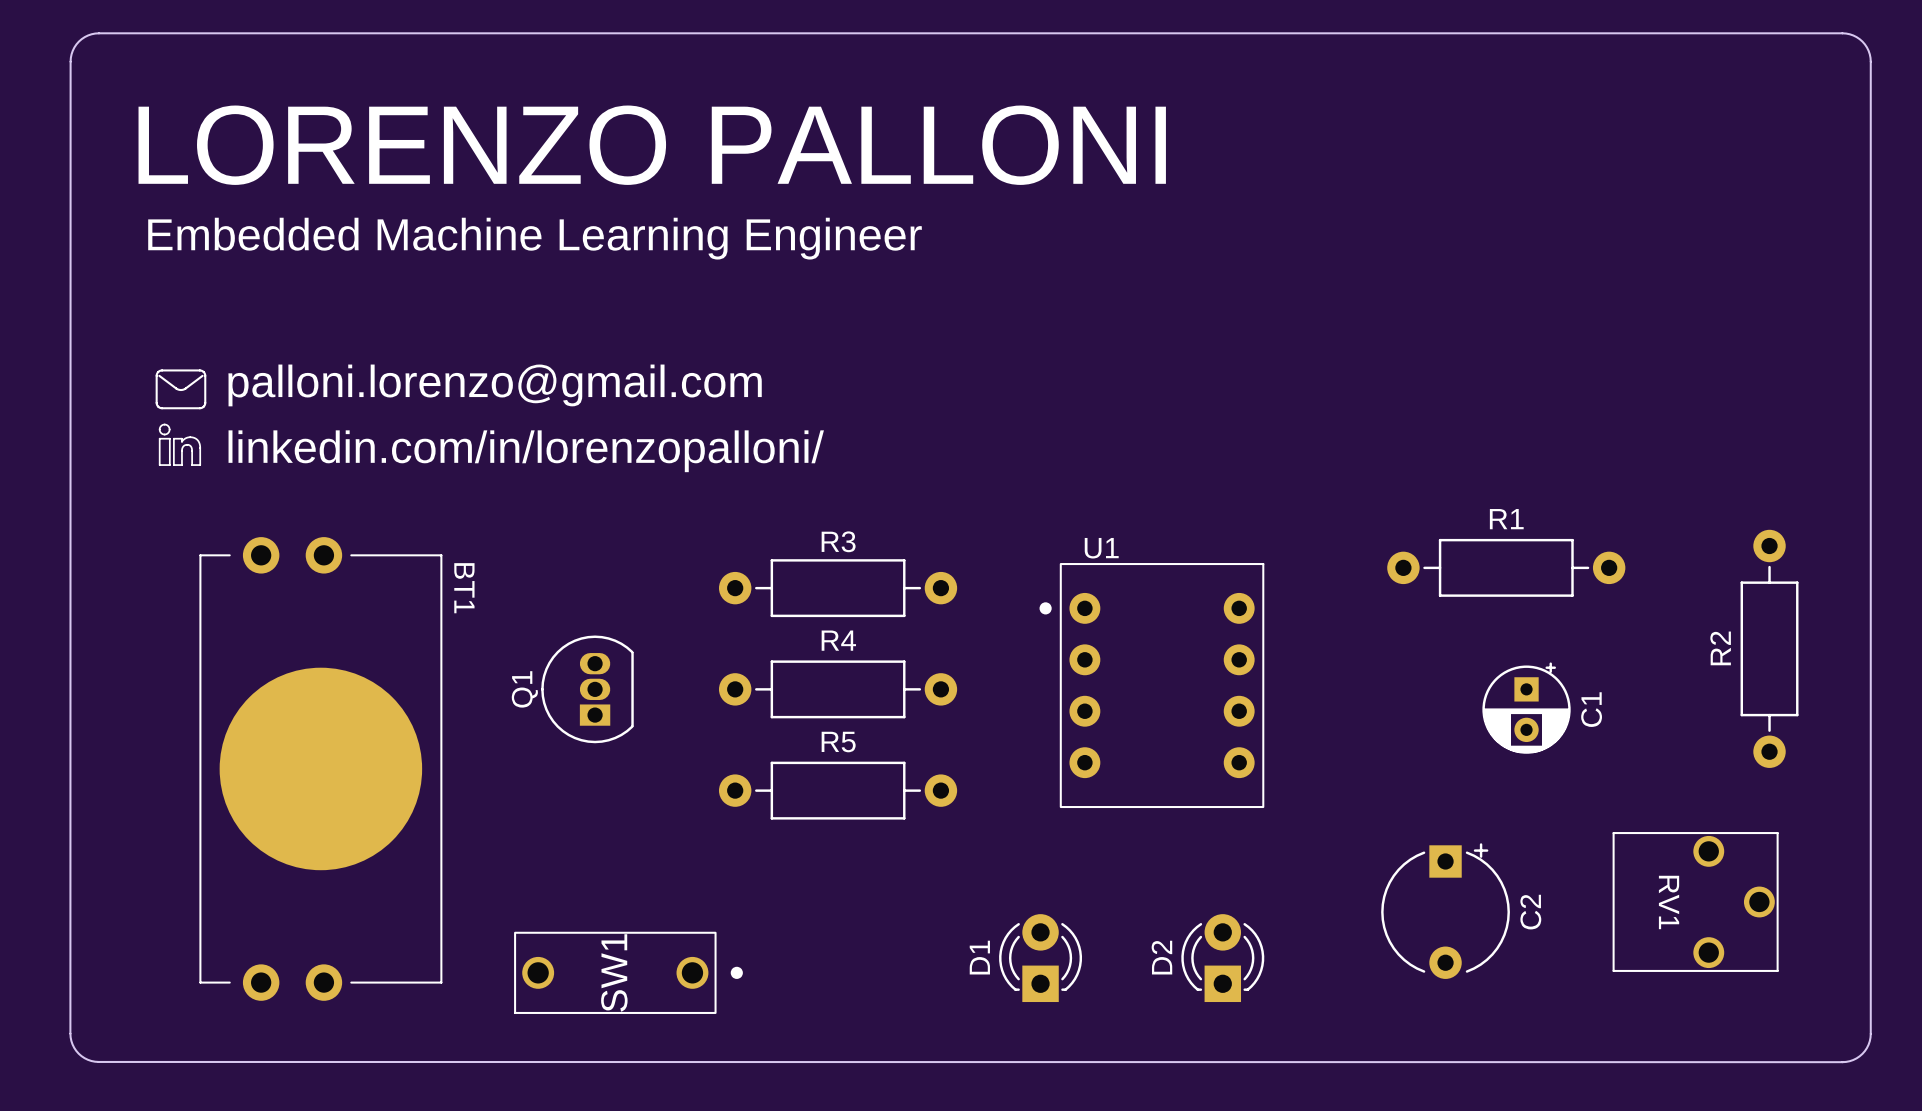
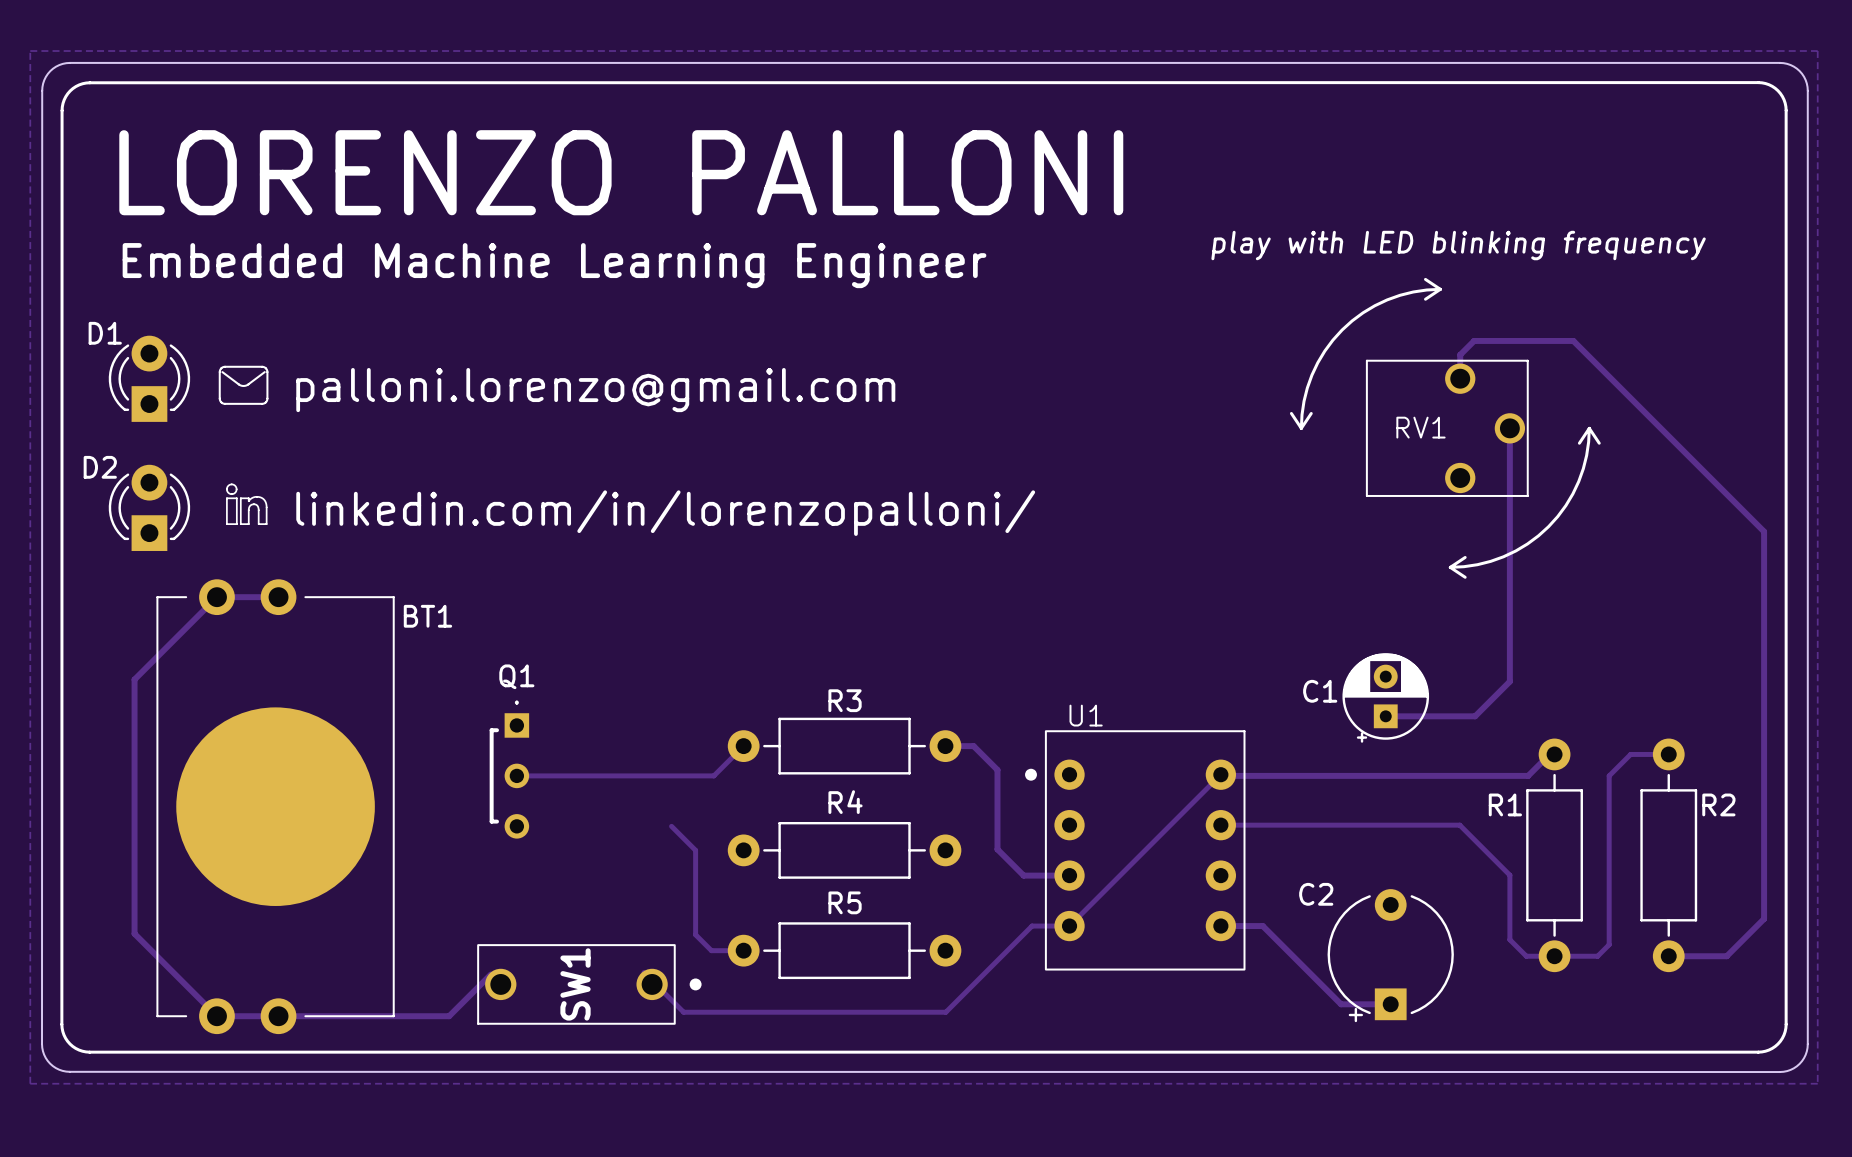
zone outline: none -> (30, 51) (1817, 51) (1817, 1083) (30, 1083) (30, 51)
line: none -> (1758, 82) (89, 82) (75, 86) (65, 96) (62, 110) (61, 1024) (65, 1038) (75, 1048) (89, 1052) (1758, 1052) (1772, 1048) (1782, 1038) (1786, 1024) (1786, 110) (1784, 99) (1777, 90) (1768, 84) (1758, 82)
text: none -> play with LED blinking frequency (1458, 245)
line: none -> (1425, 279) (1440, 289)
line: none -> (1440, 289) (1425, 299)
line: none -> (1440, 289) (1413, 292) (1387, 299) (1363, 312) (1342, 330) (1324, 351) (1311, 375) (1304, 401) (1301, 428)
track: none -> (1460, 378) (1460, 354) (1474, 340) (1573, 340) (1764, 531) (1764, 918) (1726, 956) (1673, 956)
line: (162, 370) (203, 371) (205, 375) (204, 406) (199, 408) (158, 407) (156, 403) (156, 375) (162, 370) -> (225, 366) (265, 367) (267, 372) (266, 401) (262, 403) (221, 402) (219, 398) (219, 371) (225, 366)
line: (159, 375) (180, 390) (202, 375) -> (222, 372) (243, 385) (264, 372)
text position: palloni.lorenzo@gmail.com (495, 385) -> palloni.lorenzo@gmail.com (595, 390)
line: none -> (1291, 413) (1301, 428)
line: none -> (1311, 413) (1301, 428)
track: none -> (1509, 428) (1509, 681) (1475, 716) (1385, 716)
line: none -> (1589, 428) (1599, 443)
line: none -> (1589, 428) (1579, 443)
line: none -> (1589, 428) (1586, 455) (1578, 481) (1565, 505) (1548, 526) (1527, 543) (1503, 556) (1477, 564) (1450, 567)
line: (164, 424) (169, 429) (164, 434) (159, 429) (164, 424) -> (231, 484) (236, 489) (231, 494) (226, 489) (231, 484)
line: (190, 437) (181, 441) (181, 438) (173, 438) (173, 465) (181, 465) (182, 448) (187, 444) (191, 448) (192, 465) (200, 465) (199, 443) (195, 438) (190, 437) -> (256, 496) (248, 501) (248, 498) (240, 498) (240, 524) (248, 524) (248, 508) (253, 504) (258, 507) (258, 524) (266, 524) (265, 502) (262, 498) (256, 496)
line: (159, 438) (159, 465) (169, 465) (169, 438) (159, 438) -> (226, 498) (226, 524) (236, 524) (236, 498) (226, 498)
text position: linkedin.com/in/lorenzopalloni/ (526, 451) -> linkedin.com/in/lorenzopalloni/ (665, 513)
R1 name position: R1 (1506, 519) -> R1 (1505, 804)
line: none -> (1465, 557) (1450, 567)
line: none -> (1450, 567) (1465, 577)
R1 rotation: 0° (1506, 567) -> 90° clockwise (1554, 855)
R1 position: (1506, 567) -> (1554, 855)
track: none -> (278, 597) (216, 597) (134, 679) (134, 933) (216, 1016) (449, 1016) (490, 974)
BT1 name rotation: 0° (464, 588) -> 90° counterclockwise (427, 616)
R3 position: (838, 588) -> (844, 746)
Q1 footprint: [541, 635, 634, 744] -> [489, 700, 530, 839]
R2 name rotation: 0° (1720, 648) -> 90° clockwise (1718, 804)
R2 name position: R2 (1720, 648) -> R2 (1718, 804)
R2 position: (1769, 648) -> (1668, 855)
U1 position: (1151, 685) -> (1135, 850)
Q1 name position: Q1 (524, 689) -> Q1 (516, 676)
R4 position: (838, 689) -> (844, 850)
C1 rotation: 0° (1526, 708) -> 180° (1385, 697)
C1 position: (1526, 708) -> (1385, 697)
track: none -> (743, 746) (713, 775) (516, 775) (516, 770)
track: none -> (945, 746) (973, 746) (997, 769) (997, 849) (1023, 875) (1069, 875) (1063, 875)
track: none -> (1549, 754) (1528, 775) (1220, 774)
track: none -> (1668, 754) (1630, 754) (1609, 775) (1609, 944) (1597, 956) (1526, 956) (1509, 939) (1509, 875) (1459, 825) (1220, 825) (1220, 820) (1223, 817)
track: none -> (1220, 774) (1069, 926) (1032, 926) (945, 1012) (683, 1012) (643, 972)
BT1 position: (320, 768) -> (275, 806)
R5 position: (838, 790) -> (844, 950)
track: none -> (671, 826) (695, 850) (695, 934) (711, 950) (743, 950) (743, 944)
RV1 position: (1695, 901) -> (1447, 428)
RV1 name rotation: 0° (1669, 902) -> 90° counterclockwise (1420, 427)
C2 rotation: 0° (1445, 911) -> 180° (1390, 955)
C2 name position: C2 (1530, 912) -> C2 (1316, 894)
track: none -> (1220, 926) (1262, 926) (1341, 1004) (1380, 1004)
D1 name rotation: 0° (979, 957) -> 90° clockwise (105, 333)
D2 name rotation: 0° (1161, 957) -> 90° clockwise (100, 467)
D1 position: (1040, 958) -> (149, 378)
D2 position: (1222, 958) -> (149, 507)

